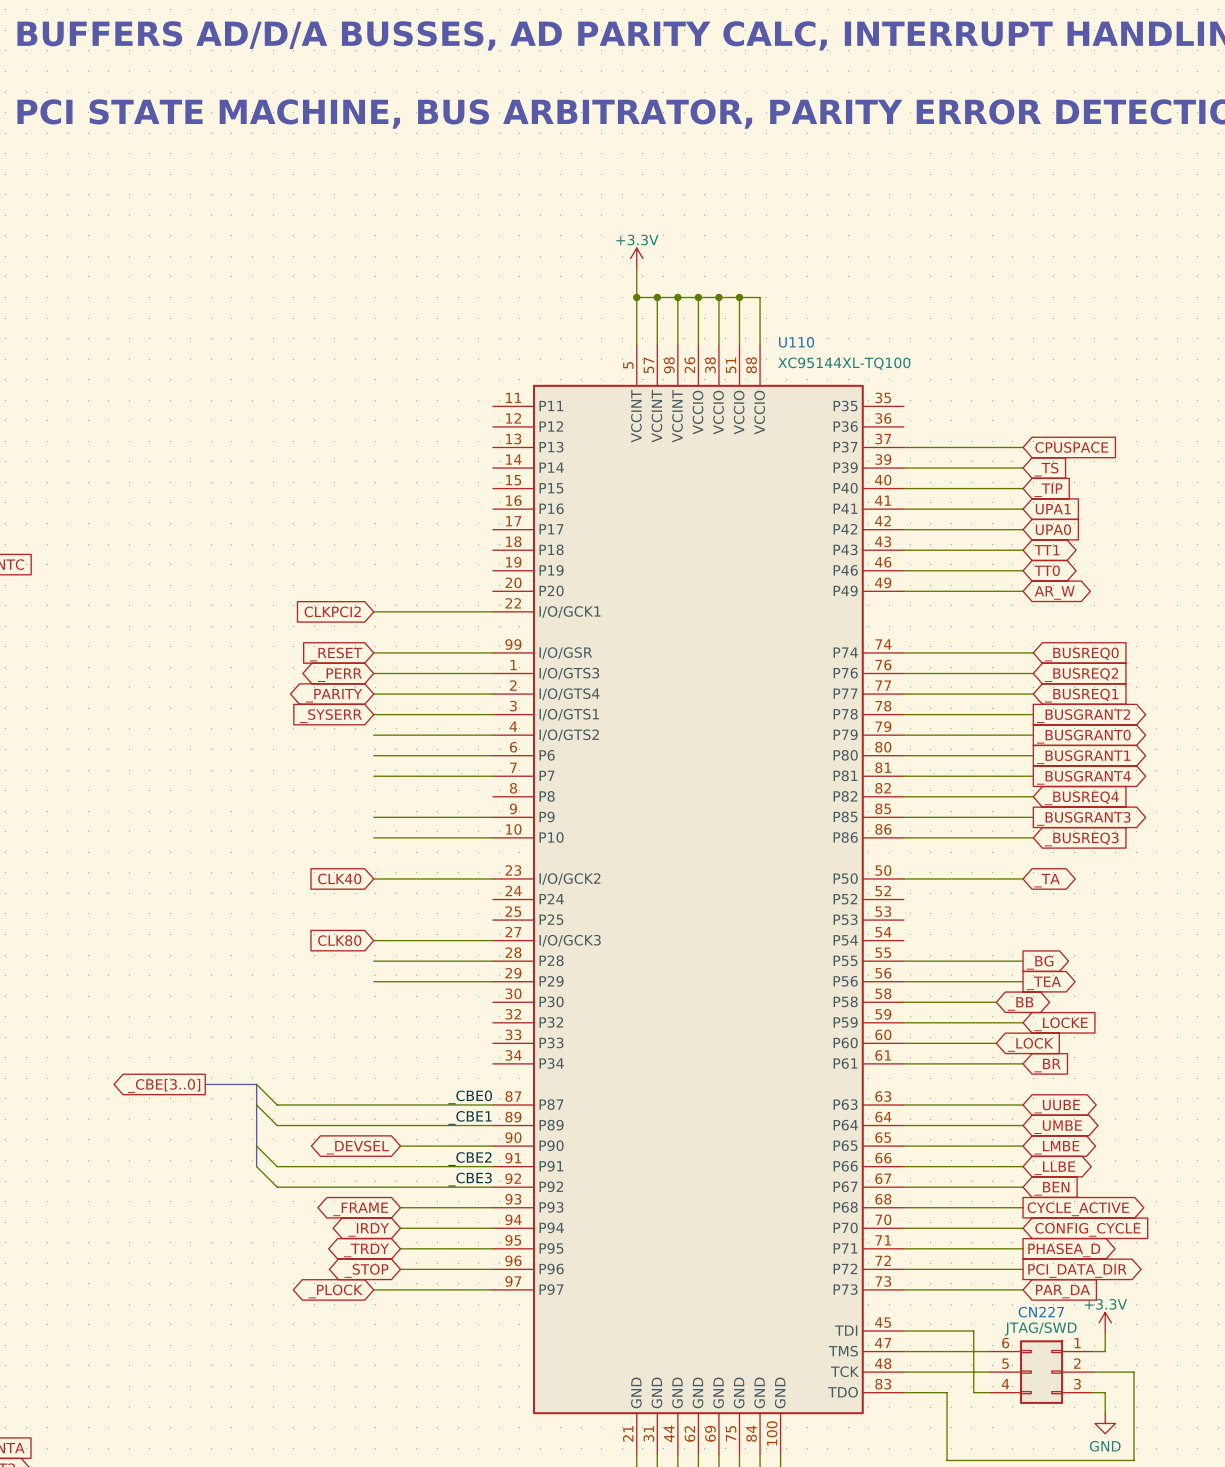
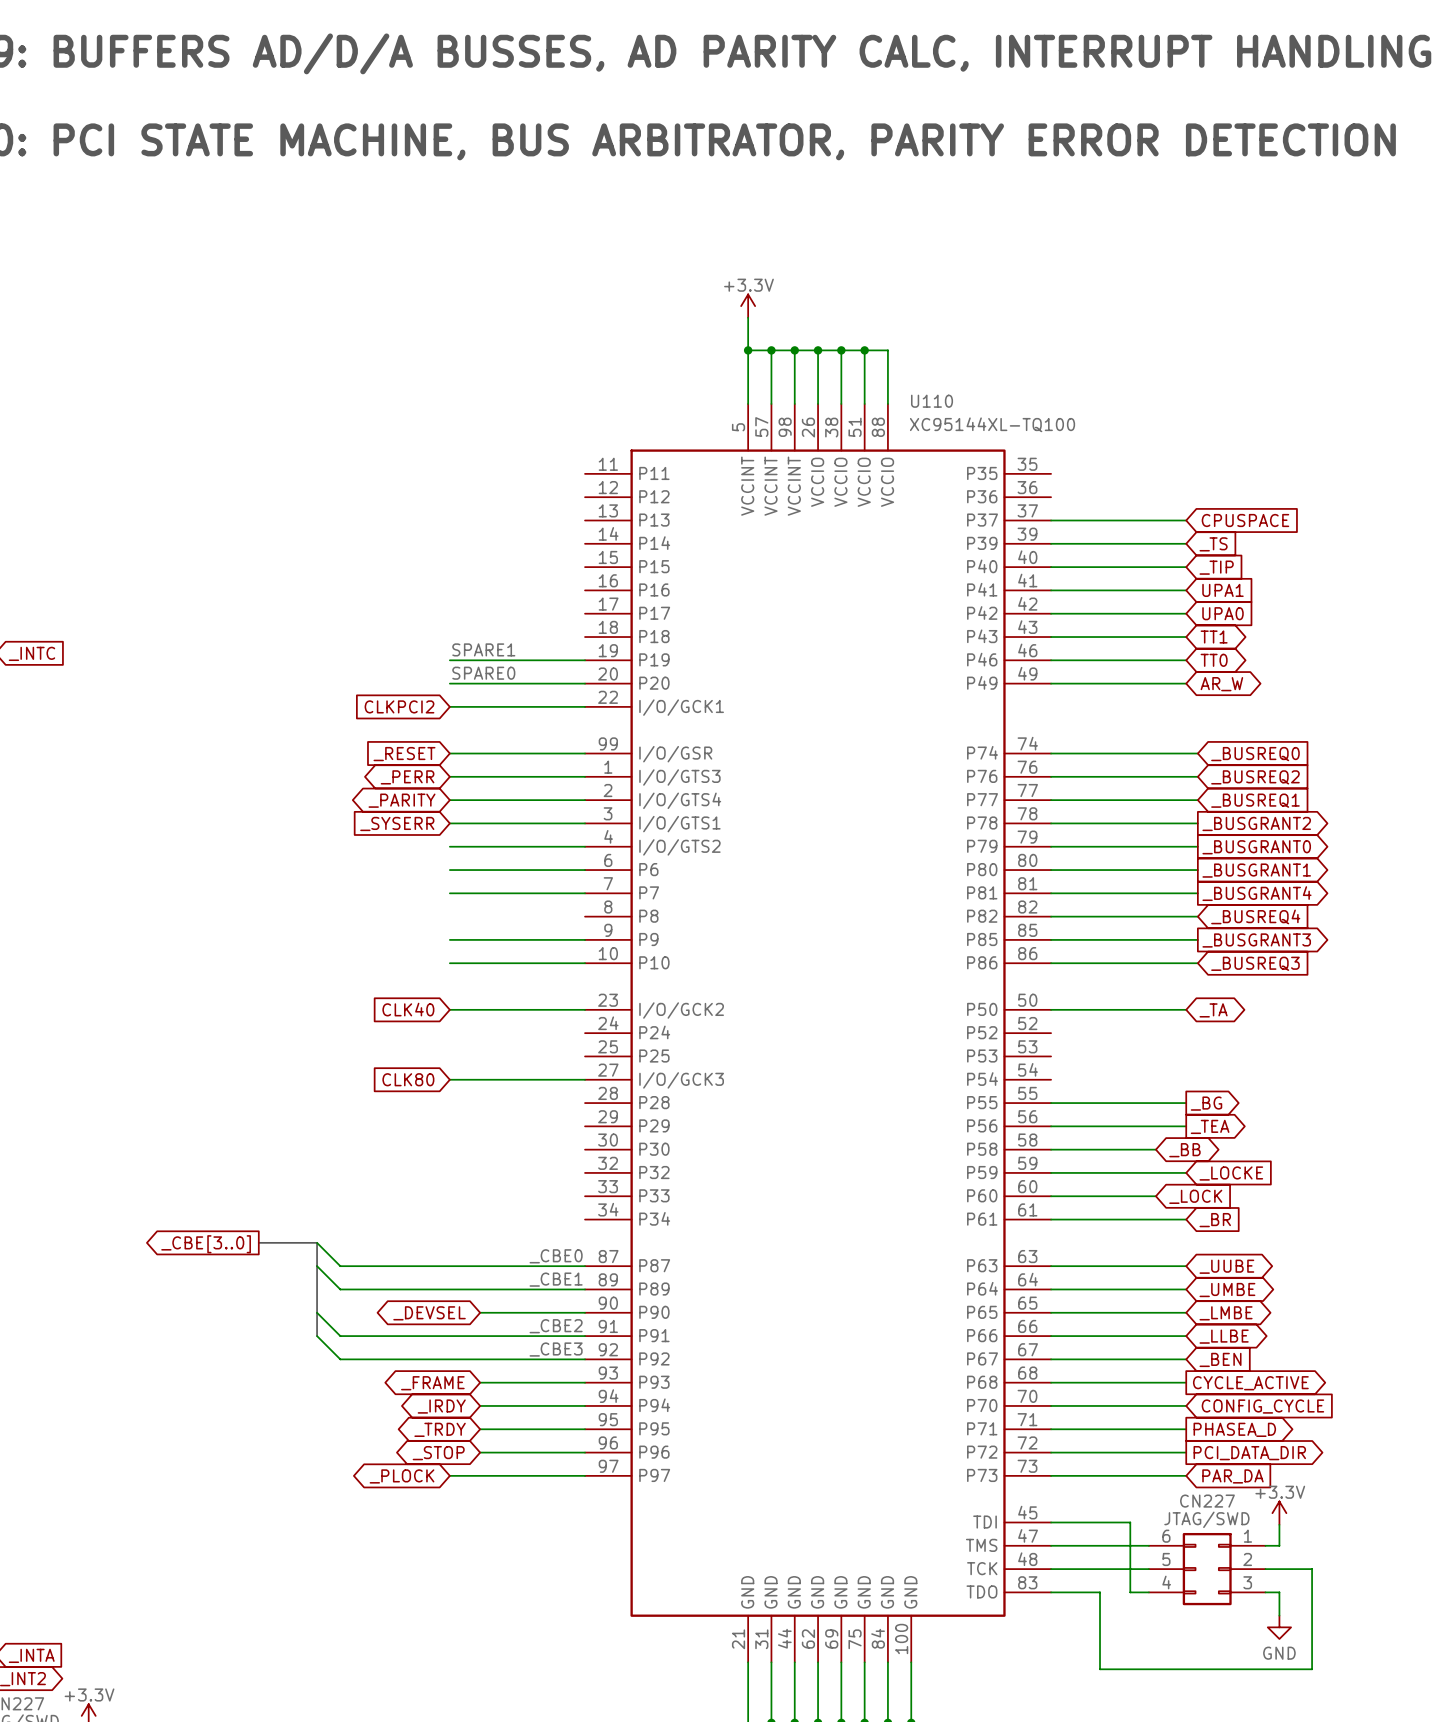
label: none -> SPARE1 (483, 649)
wire: none -> (449, 660) (585, 660)
label: none -> SPARE0 (483, 673)
wire: none -> (449, 683) (585, 683)
wire: (373, 961) (492, 961) -> none
wire: (373, 981) (492, 981) -> none

